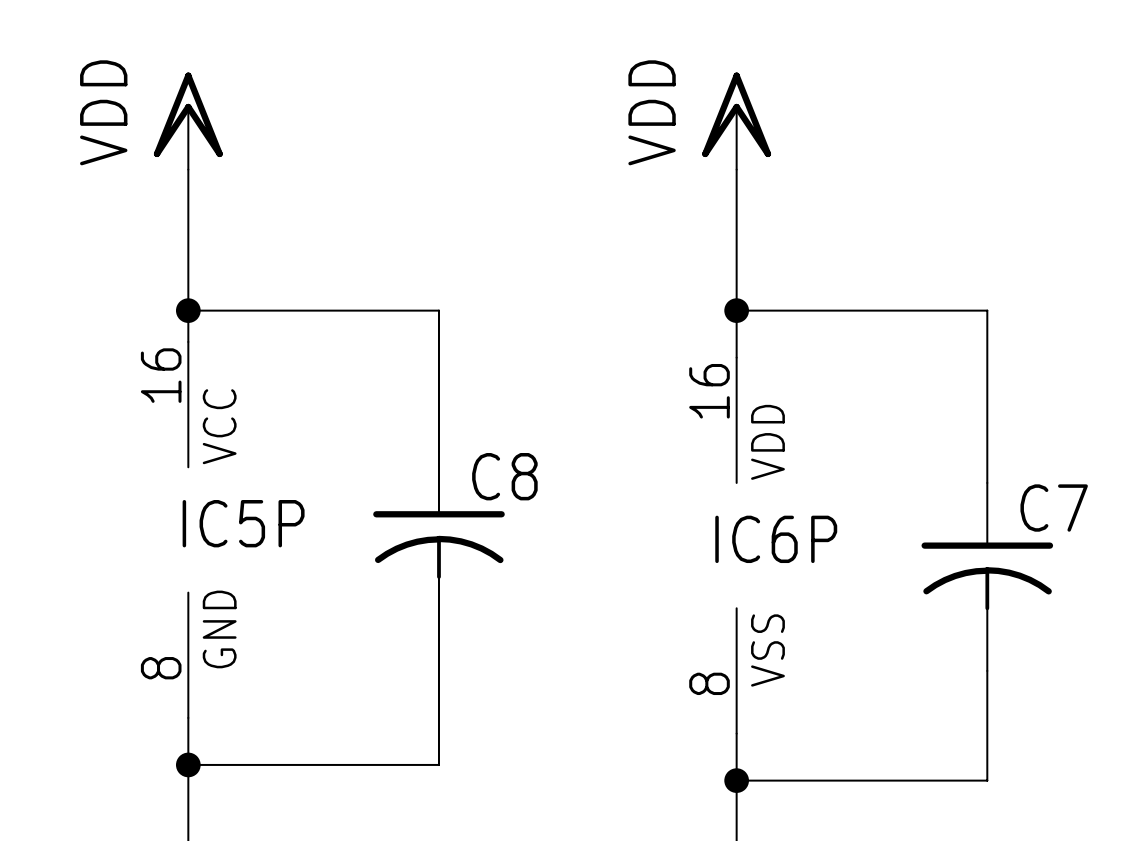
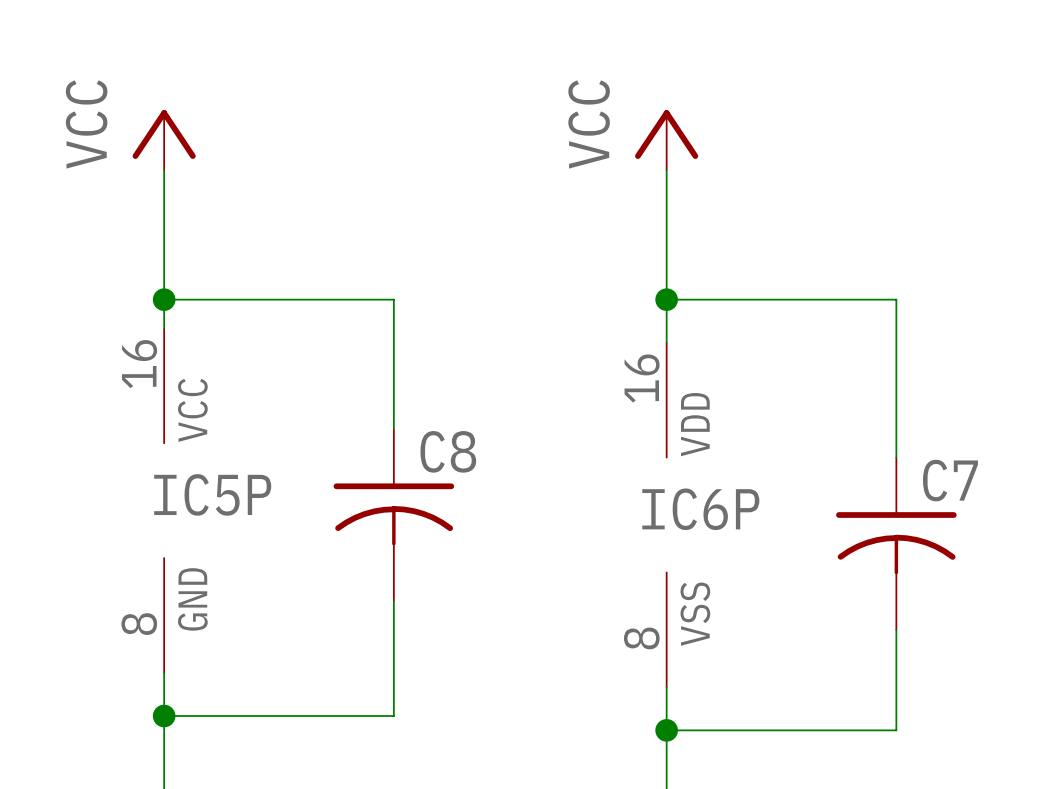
power symbol: VDD (188, 121) -> VCC (164, 140)
power symbol: VDD (736, 121) -> VCC (666, 140)

